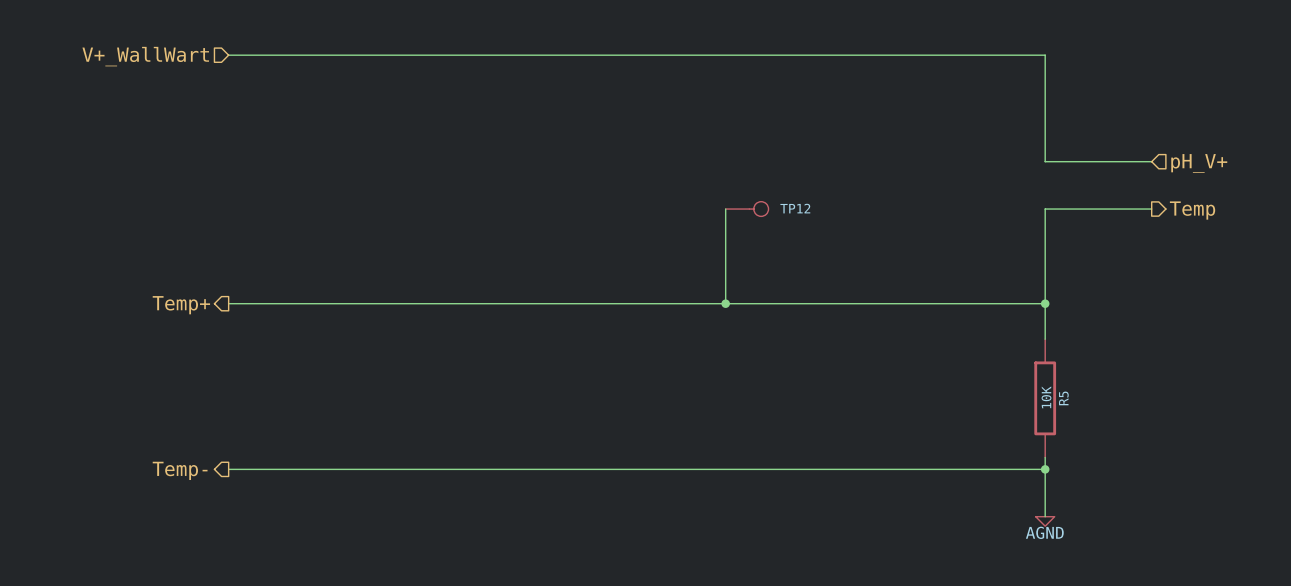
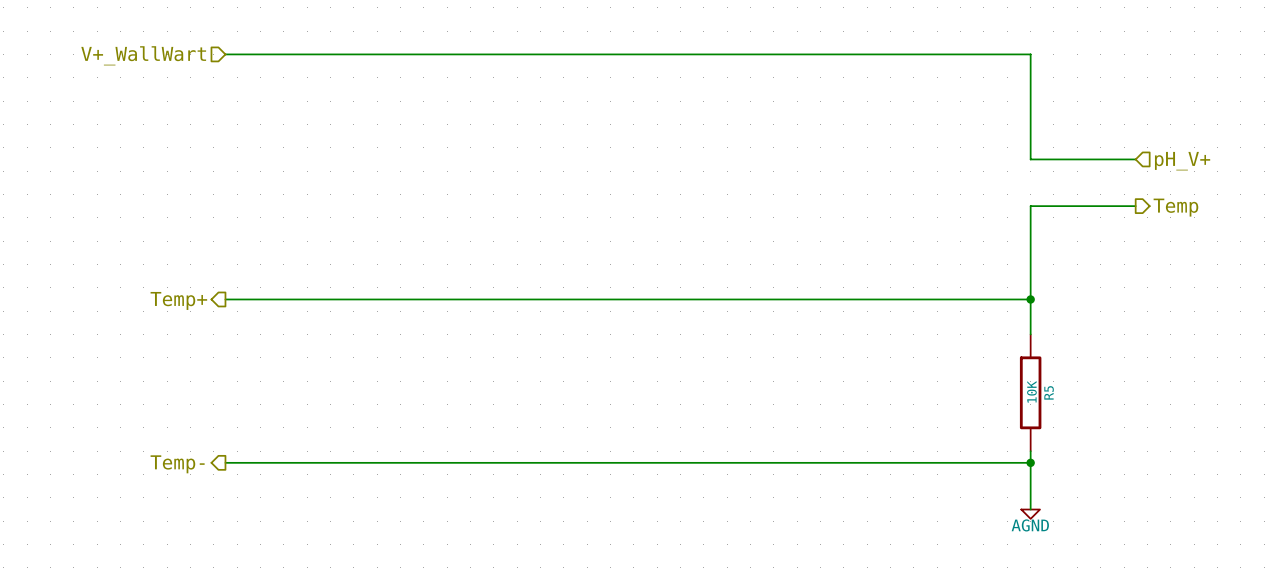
wire: (725, 209) (725, 303) -> none
TP12: (747, 209) -> none
junction: (725, 303) -> none

